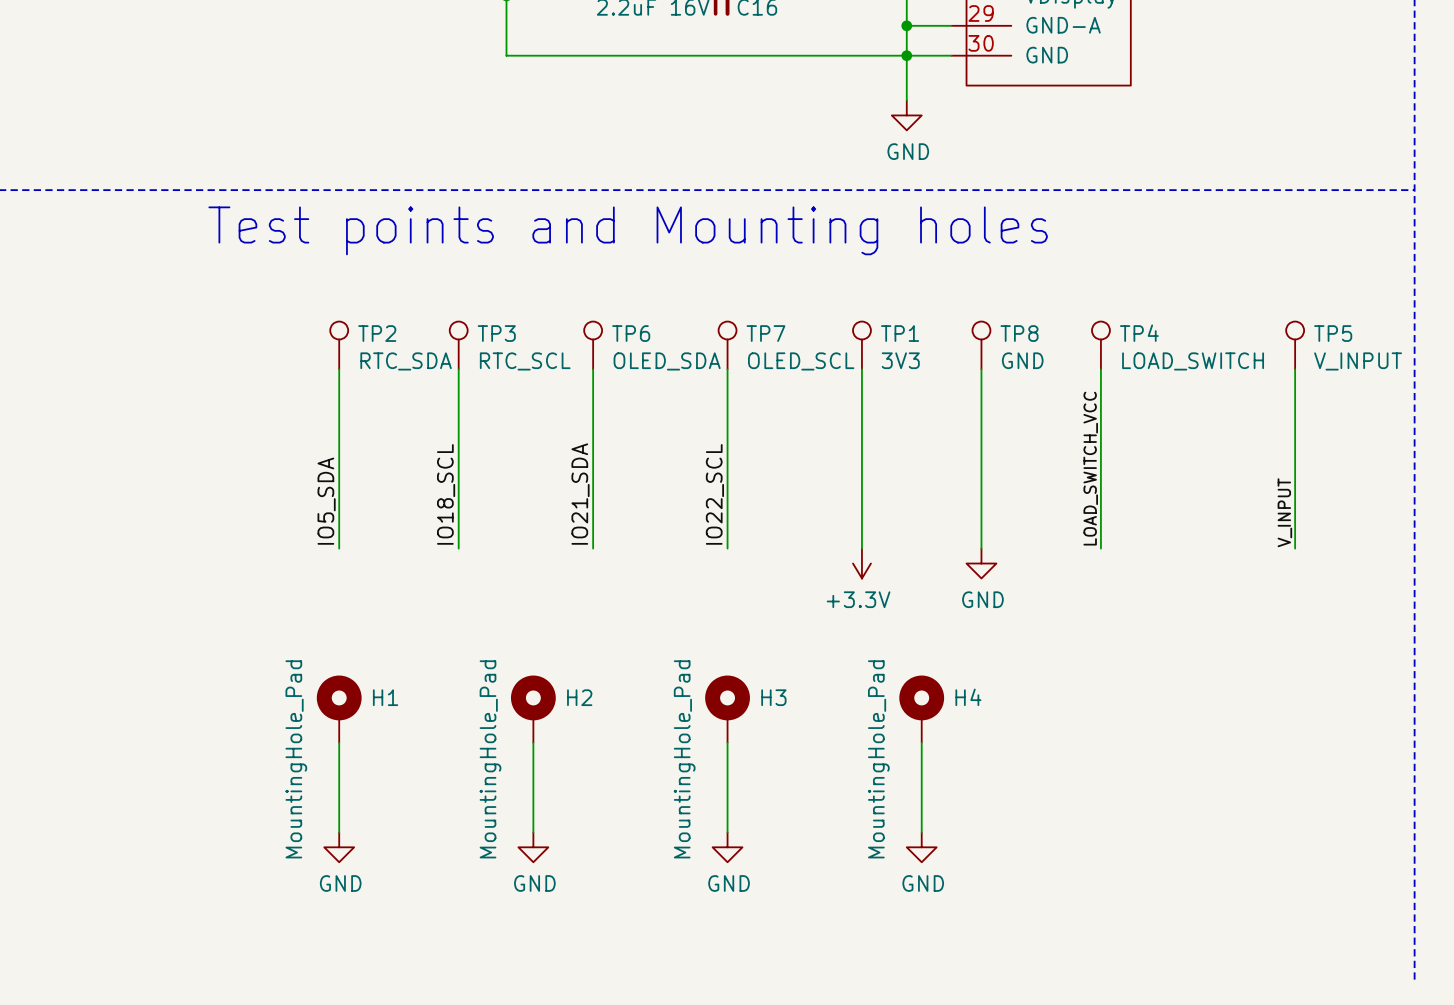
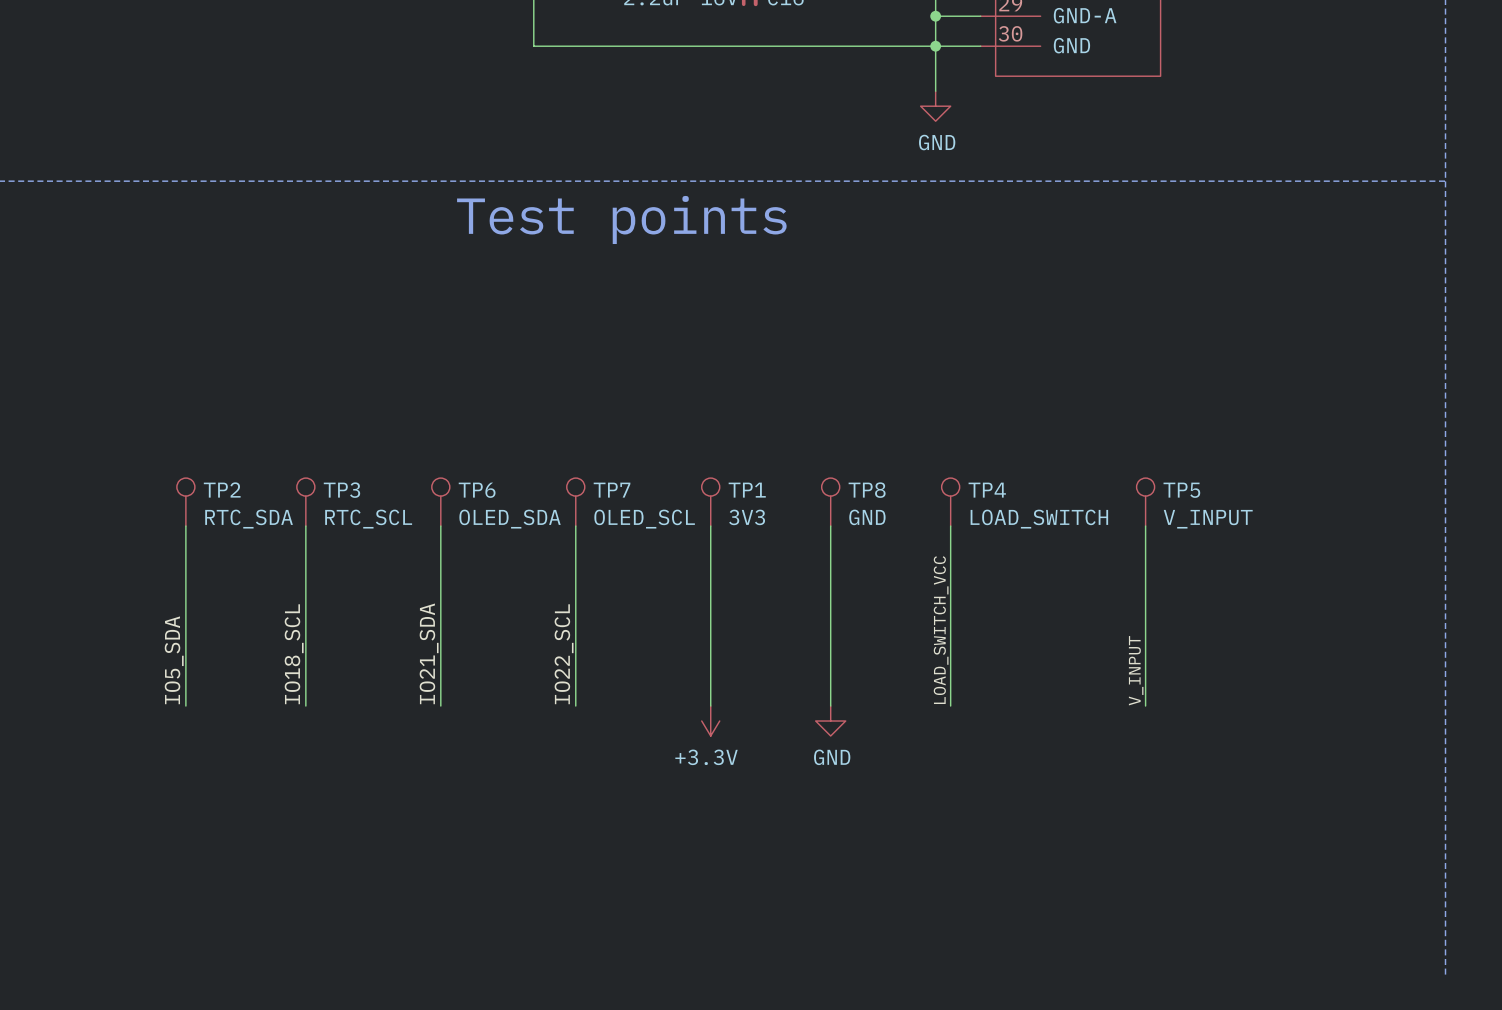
text: none -> Test points (621, 219)
text: Test points and Mounting holes (628, 230) -> none
TP2 position: (339, 345) -> (185, 502)
TP3 position: (458, 345) -> (305, 502)
TP6 position: (593, 345) -> (440, 502)
TP7 position: (727, 345) -> (575, 502)
TP1 position: (861, 345) -> (710, 502)
TP8 position: (981, 345) -> (830, 502)
TP4 position: (1100, 345) -> (950, 502)
TP5 position: (1295, 345) -> (1145, 502)
wire: (339, 369) (339, 548) -> (185, 526) (185, 706)
wire: (458, 369) (458, 548) -> (305, 526) (305, 706)
wire: (593, 369) (593, 548) -> (440, 526) (440, 706)
wire: (727, 369) (727, 548) -> (575, 526) (575, 706)
wire: (861, 369) (861, 548) -> (710, 526) (710, 706)
wire: (981, 369) (981, 548) -> (830, 526) (830, 706)
wire: (1100, 369) (1100, 548) -> (950, 526) (950, 706)
wire: (1295, 369) (1295, 548) -> (1145, 526) (1145, 706)
label position: LOAD_SWITCH_VCC (1090, 468) -> LOAD_SWITCH_VCC (941, 630)
label position: IO18_SCL (446, 494) -> IO18_SCL (294, 654)
label position: IO21_SDA (580, 494) -> IO21_SDA (429, 653)
label position: IO22_SCL (714, 494) -> IO22_SCL (564, 654)
label position: IO5_SDA (326, 501) -> IO5_SDA (174, 660)
label position: V_INPUT (1284, 512) -> V_INPUT (1136, 670)
power symbol position: +3.3V (861, 563) -> +3.3V (710, 721)
power symbol: GND (981, 563) -> none
H1: MountingHole_Pad (339, 709) -> none
H2: MountingHole_Pad (533, 709) -> none
H3: MountingHole_Pad (727, 709) -> none
H4: MountingHole_Pad (921, 709) -> none
power symbol: none -> GND (830, 721)
wire: (339, 742) (339, 832) -> none
wire: (533, 742) (533, 832) -> none
wire: (727, 742) (727, 832) -> none
wire: (921, 742) (921, 832) -> none
power symbol: GND (339, 847) -> none
power symbol: GND (533, 847) -> none
power symbol: GND (727, 847) -> none
power symbol: GND (921, 847) -> none

